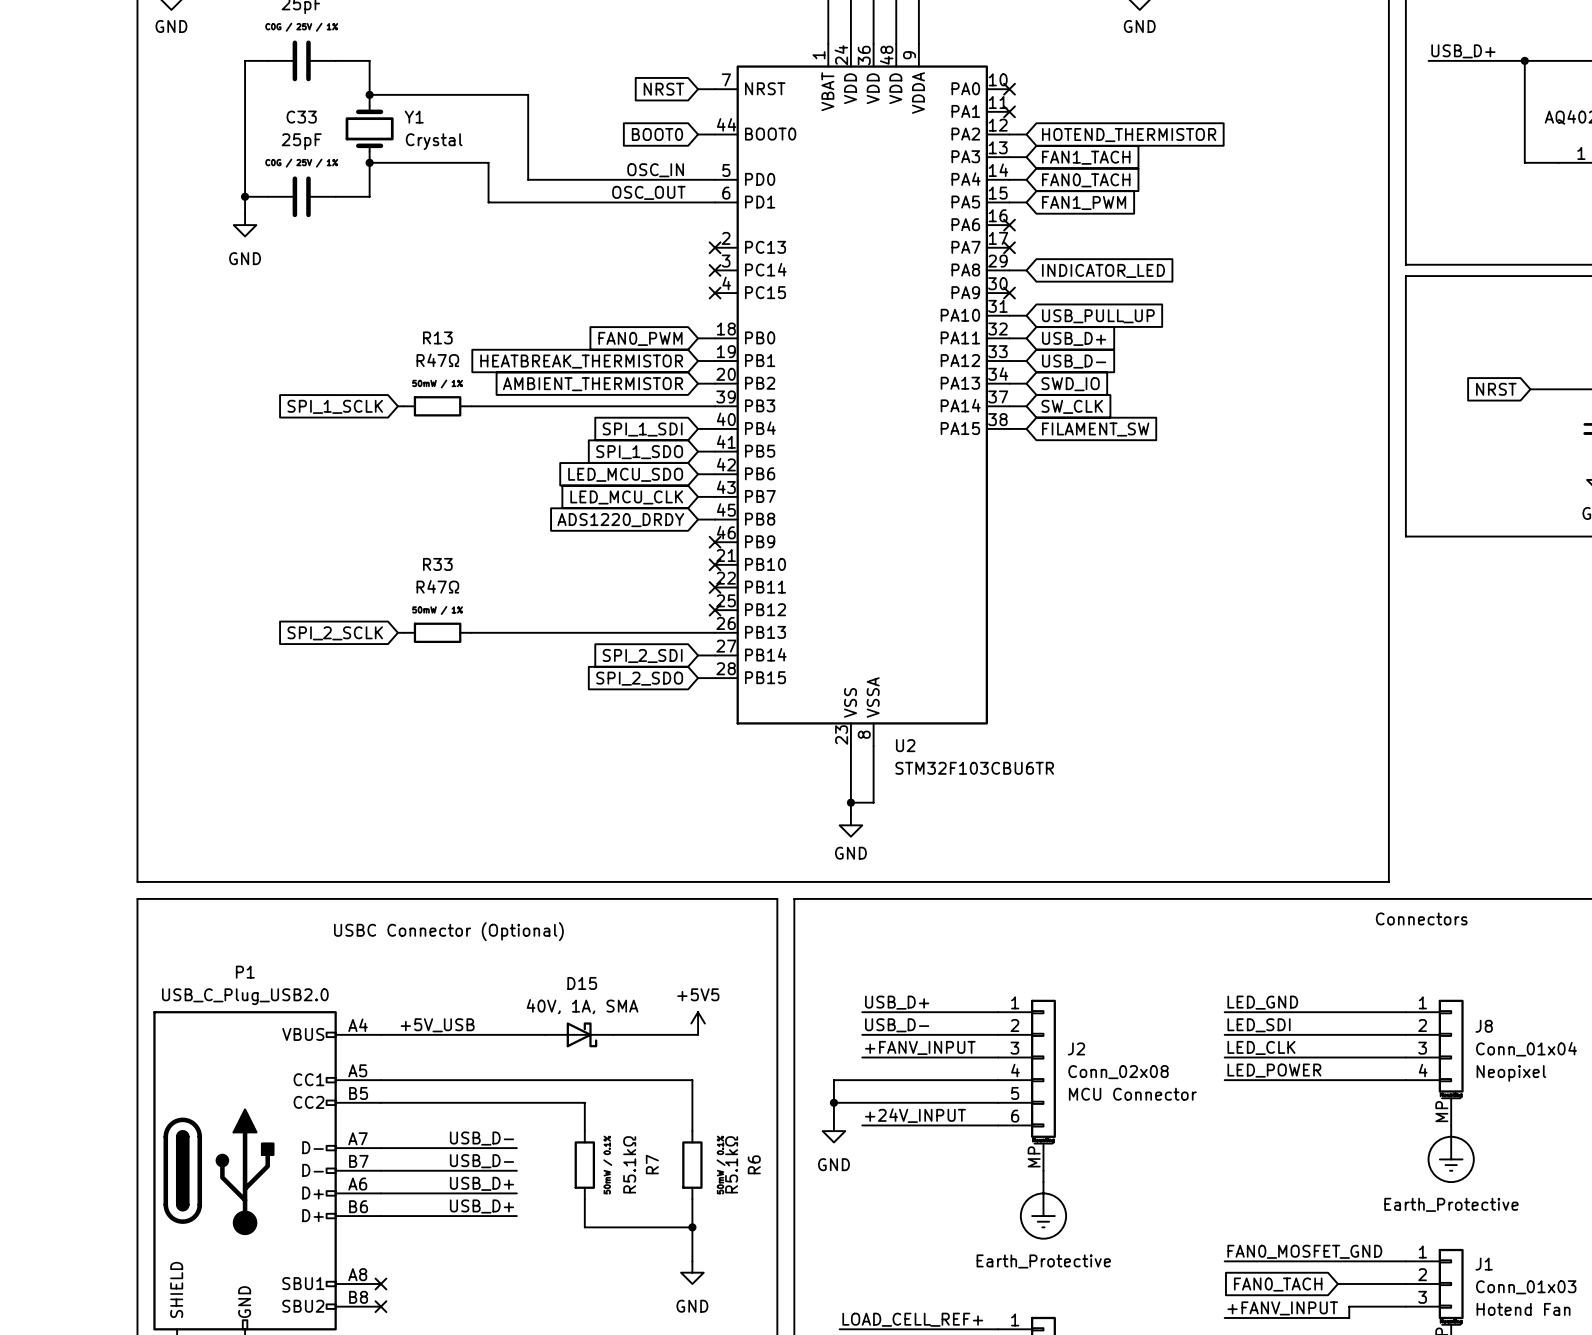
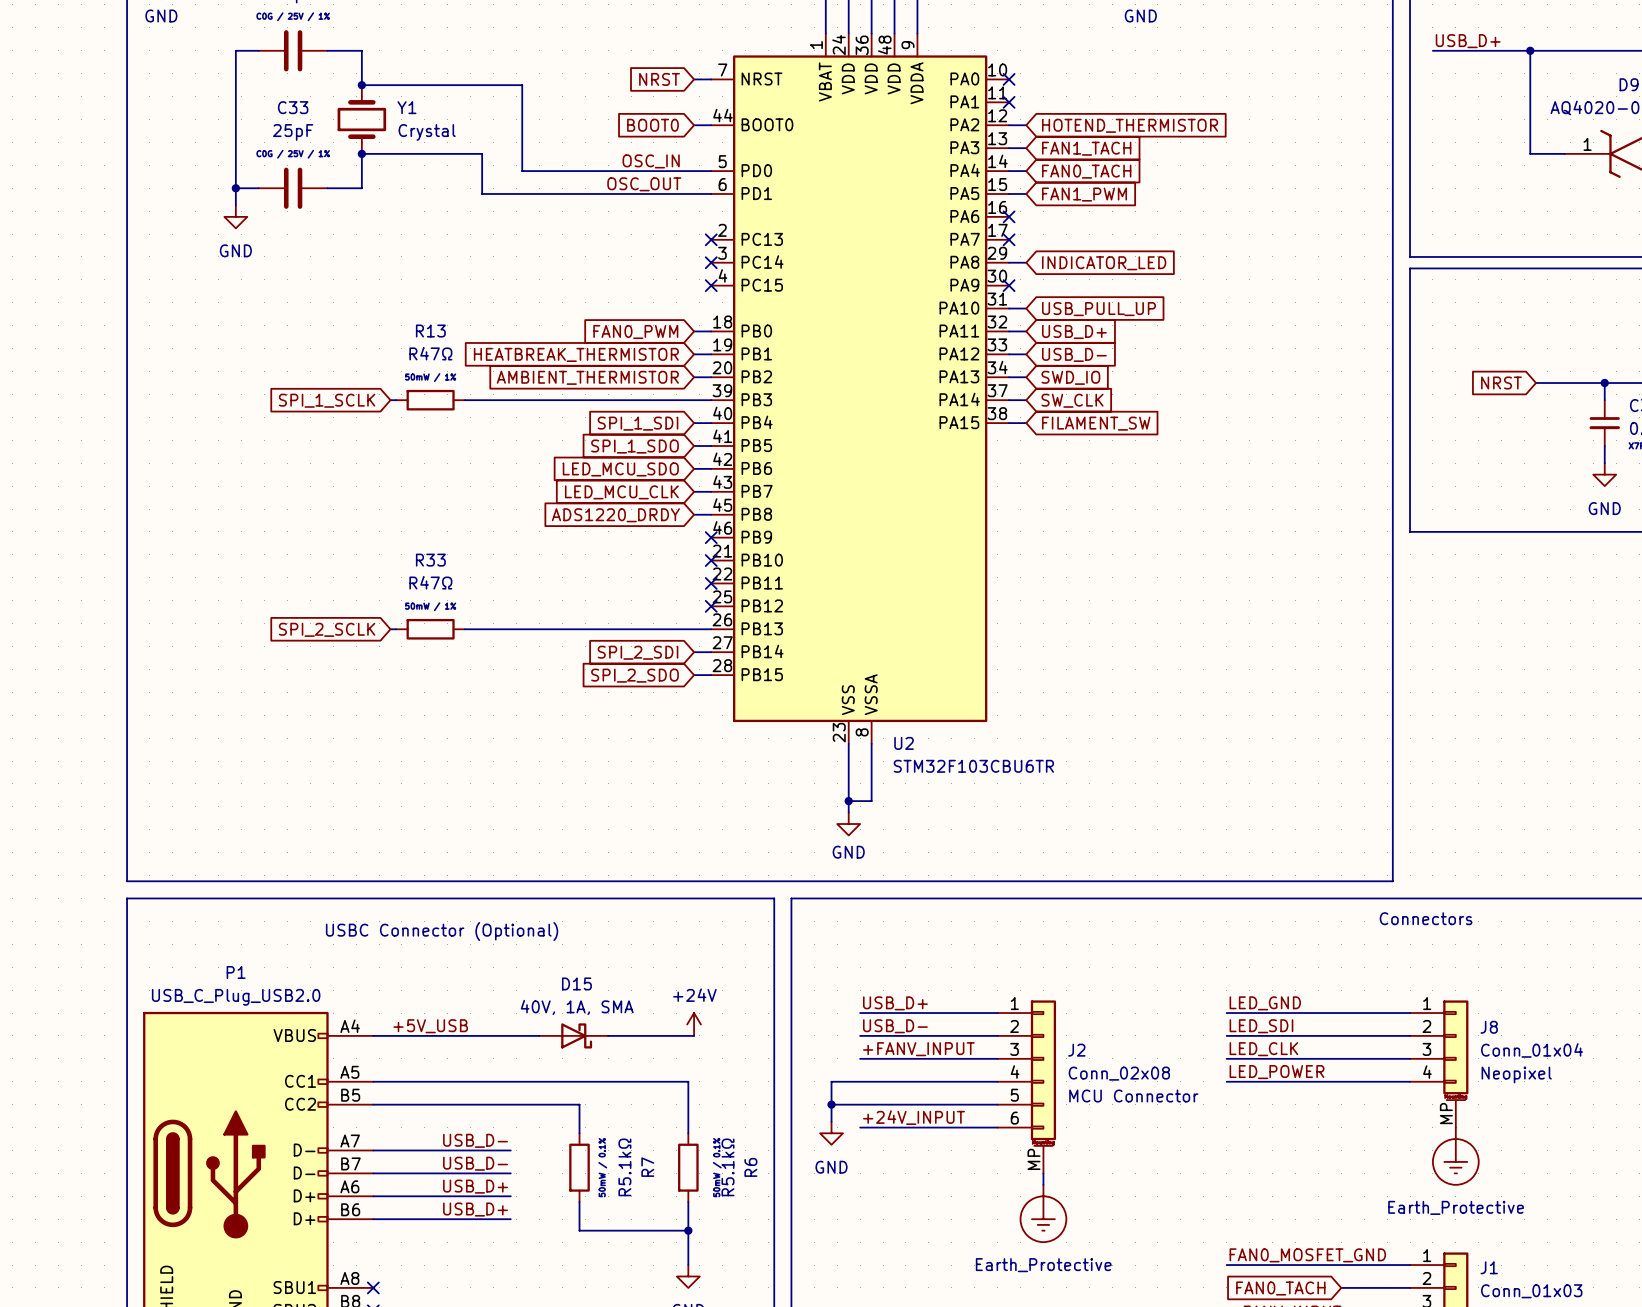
power symbol: +5V5 (698, 1023) -> +24V (694, 1024)

